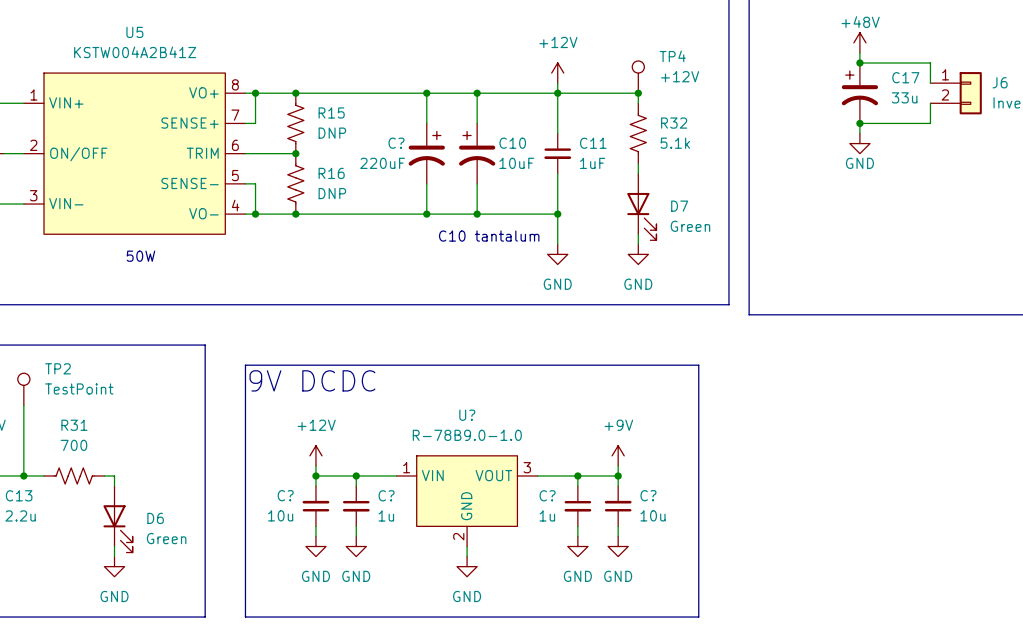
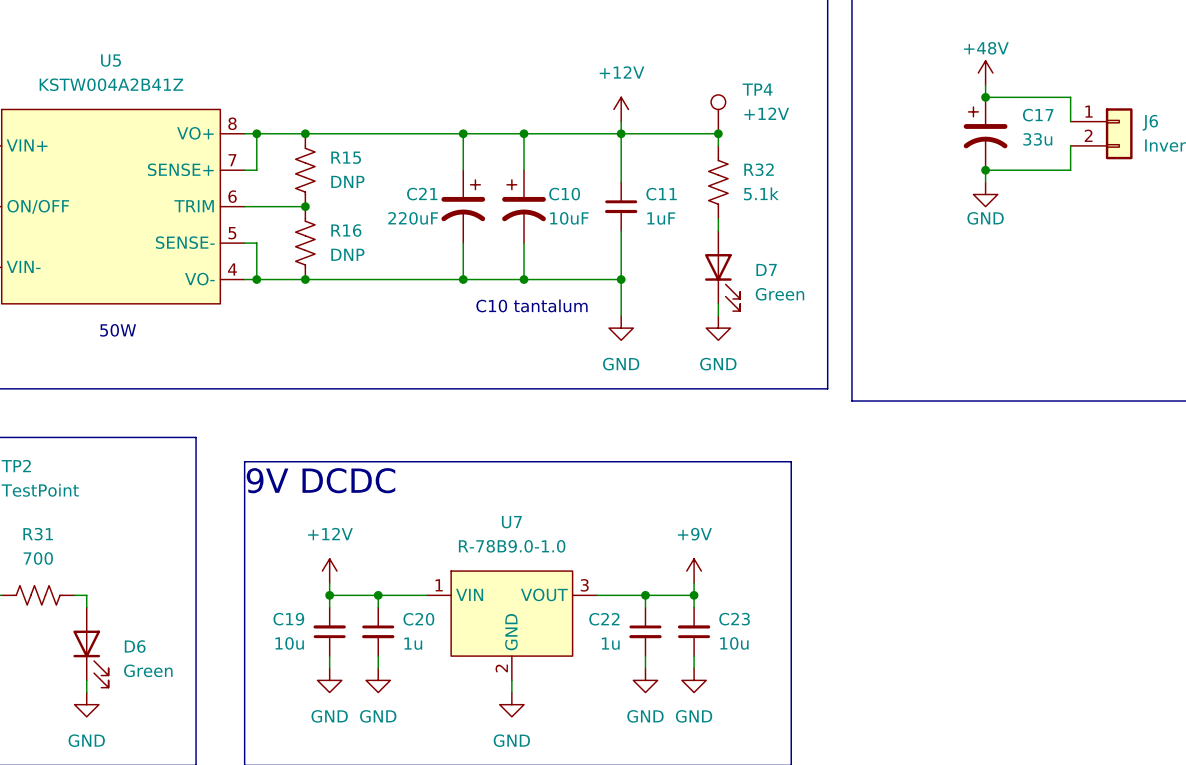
C? name: C? (396, 143) -> C21 (422, 194)
U? name: U? (467, 415) -> U7 (511, 522)
C? name: C? (285, 495) -> C19 (288, 619)
C? name: C? (386, 495) -> C20 (418, 619)
C? name: C? (547, 495) -> C22 (604, 619)
C? name: C? (648, 495) -> C23 (734, 619)

